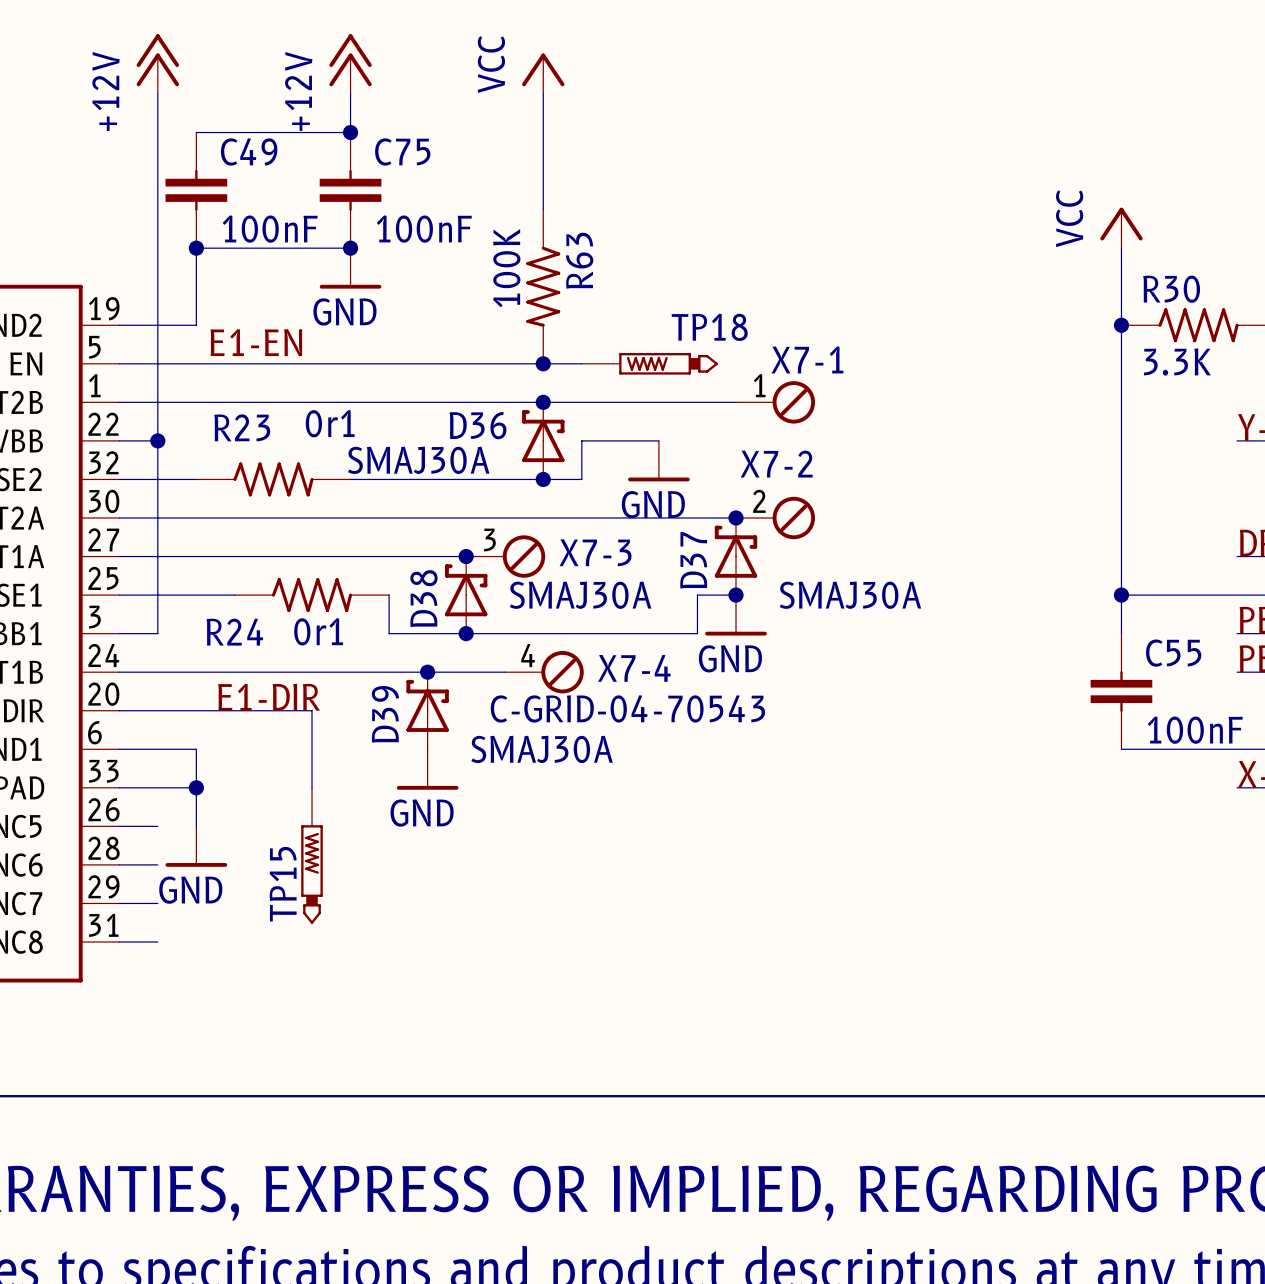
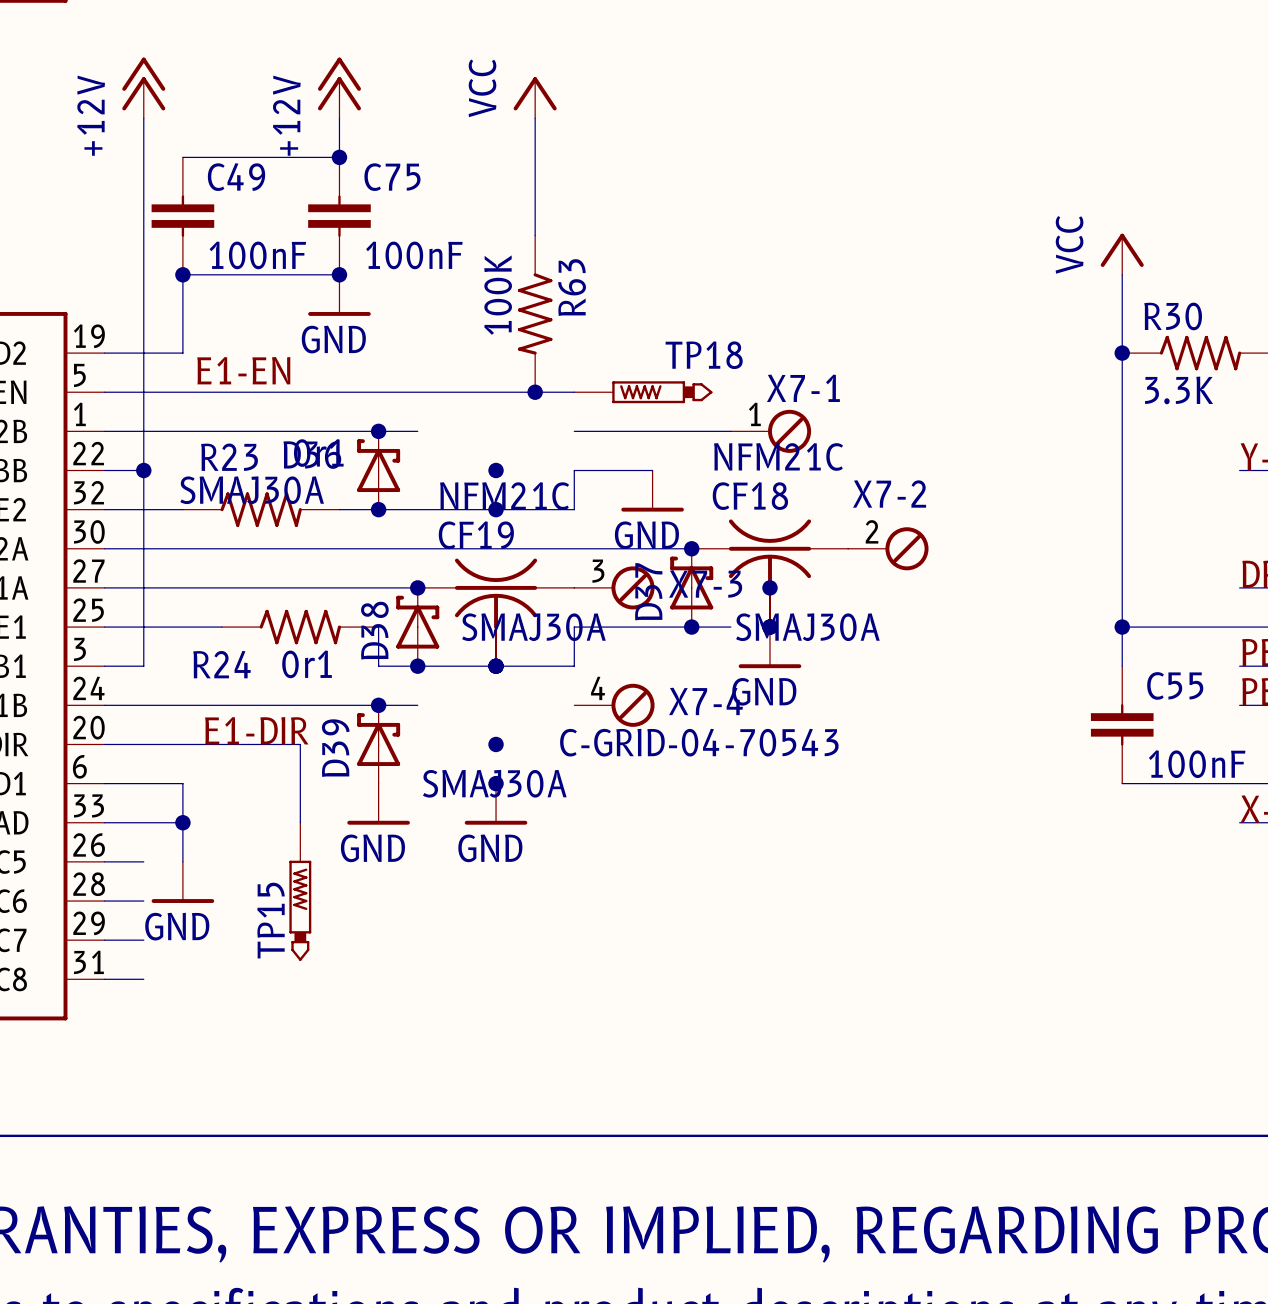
junction: none -> (378, 431)
wire: (427, 402) (581, 402) -> none
junction: (543, 402) -> none
junction: none -> (496, 470)
D36 position: (543, 440) -> (378, 470)
junction: none -> (378, 509)
junction: none -> (496, 509)
junction: (543, 479) -> none
junction: none -> (691, 548)
junction: (736, 518) -> none
X7-2 position: (775, 518) -> (888, 548)
CF18: none -> NFM21C (769, 573)
junction position: (466, 556) -> (417, 587)
X7-3 position: (505, 556) -> (614, 587)
D37 position: (736, 556) -> (691, 587)
junction: none -> (769, 587)
CF19: none -> NFM21C (496, 612)
D38 position: (466, 595) -> (417, 627)
wire: (697, 595) (697, 633) (581, 633) -> (691, 627) (574, 627) (574, 666)
junction: none -> (691, 627)
junction: (736, 595) -> none
junction: none -> (769, 627)
power symbol position: GND (736, 615) -> GND (769, 647)
junction: none -> (417, 666)
junction: (466, 633) -> none
junction: none -> (496, 666)
junction: none -> (378, 705)
wire: (427, 672) (504, 672) -> none
junction: (427, 672) -> none
X7-4 position: (544, 672) -> (614, 705)
D39 position: (427, 710) -> (378, 744)
junction: none -> (496, 744)
junction: none -> (496, 783)
power symbol: none -> GND (378, 804)
power symbol: GND (427, 769) -> none
power symbol: none -> GND (496, 804)

